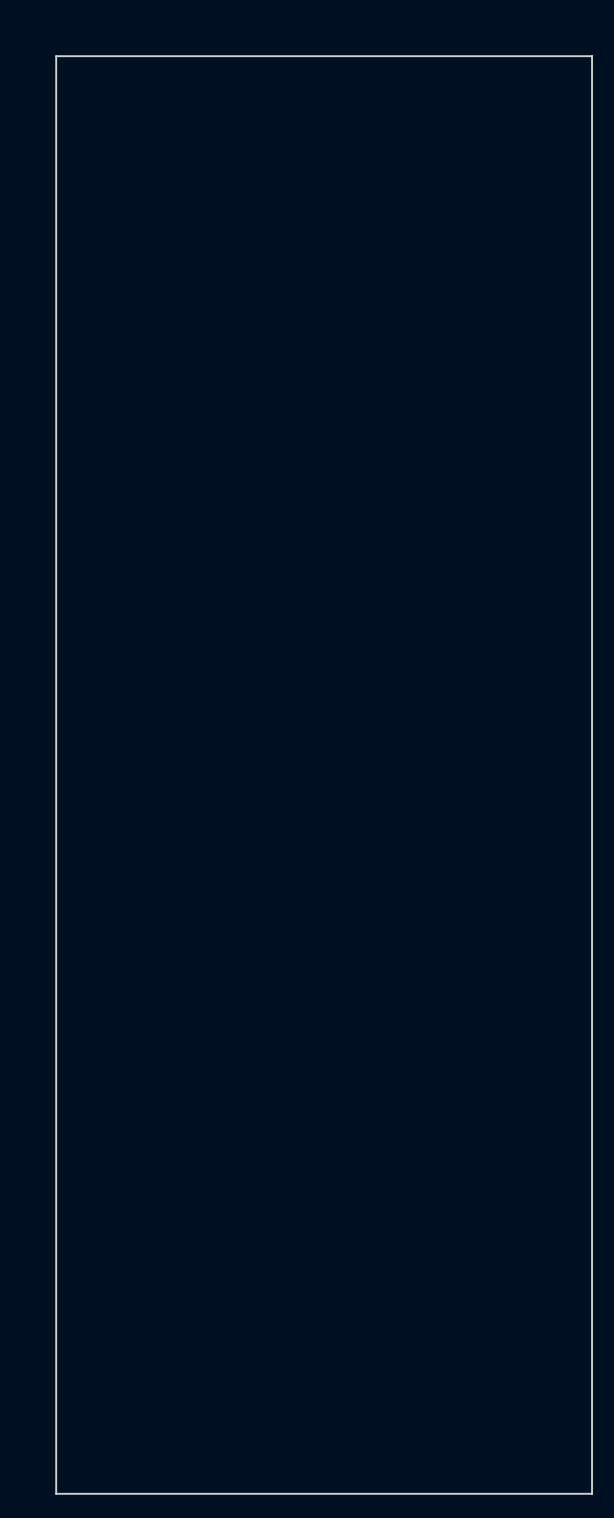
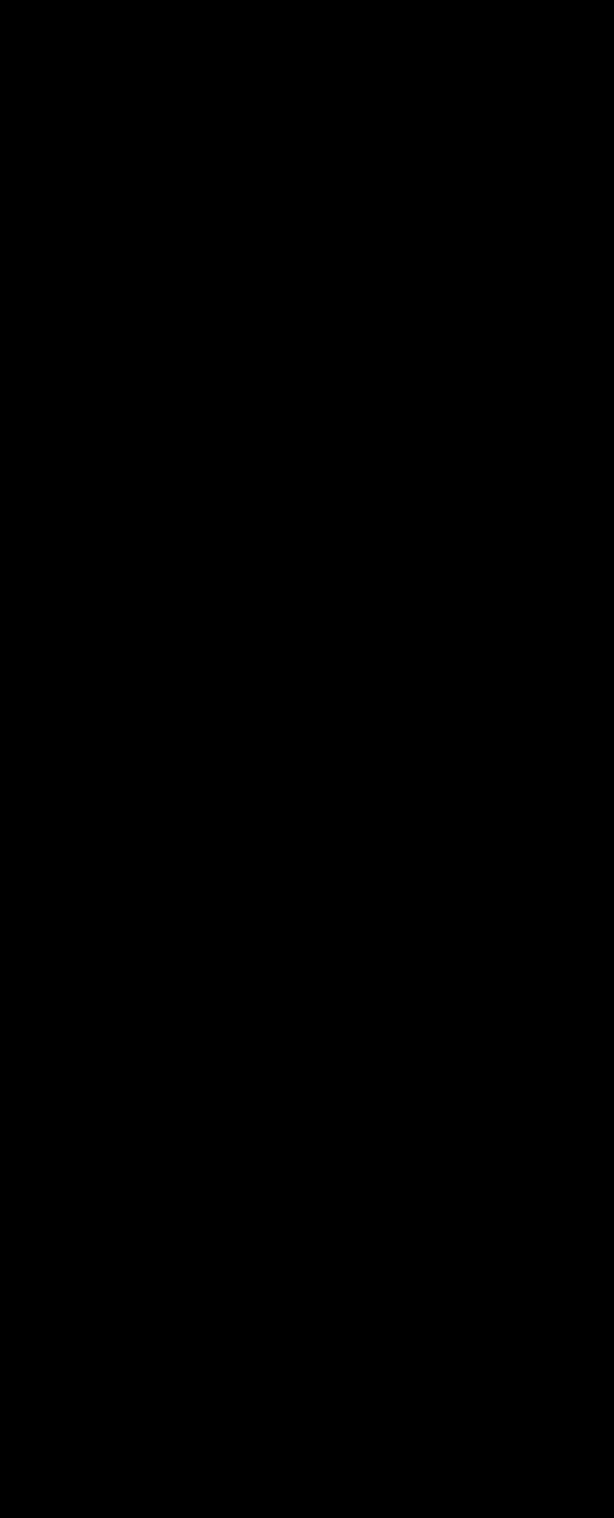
board edge: (56, 56) (592, 56) (592, 1493) (56, 1493) (56, 56) -> none

